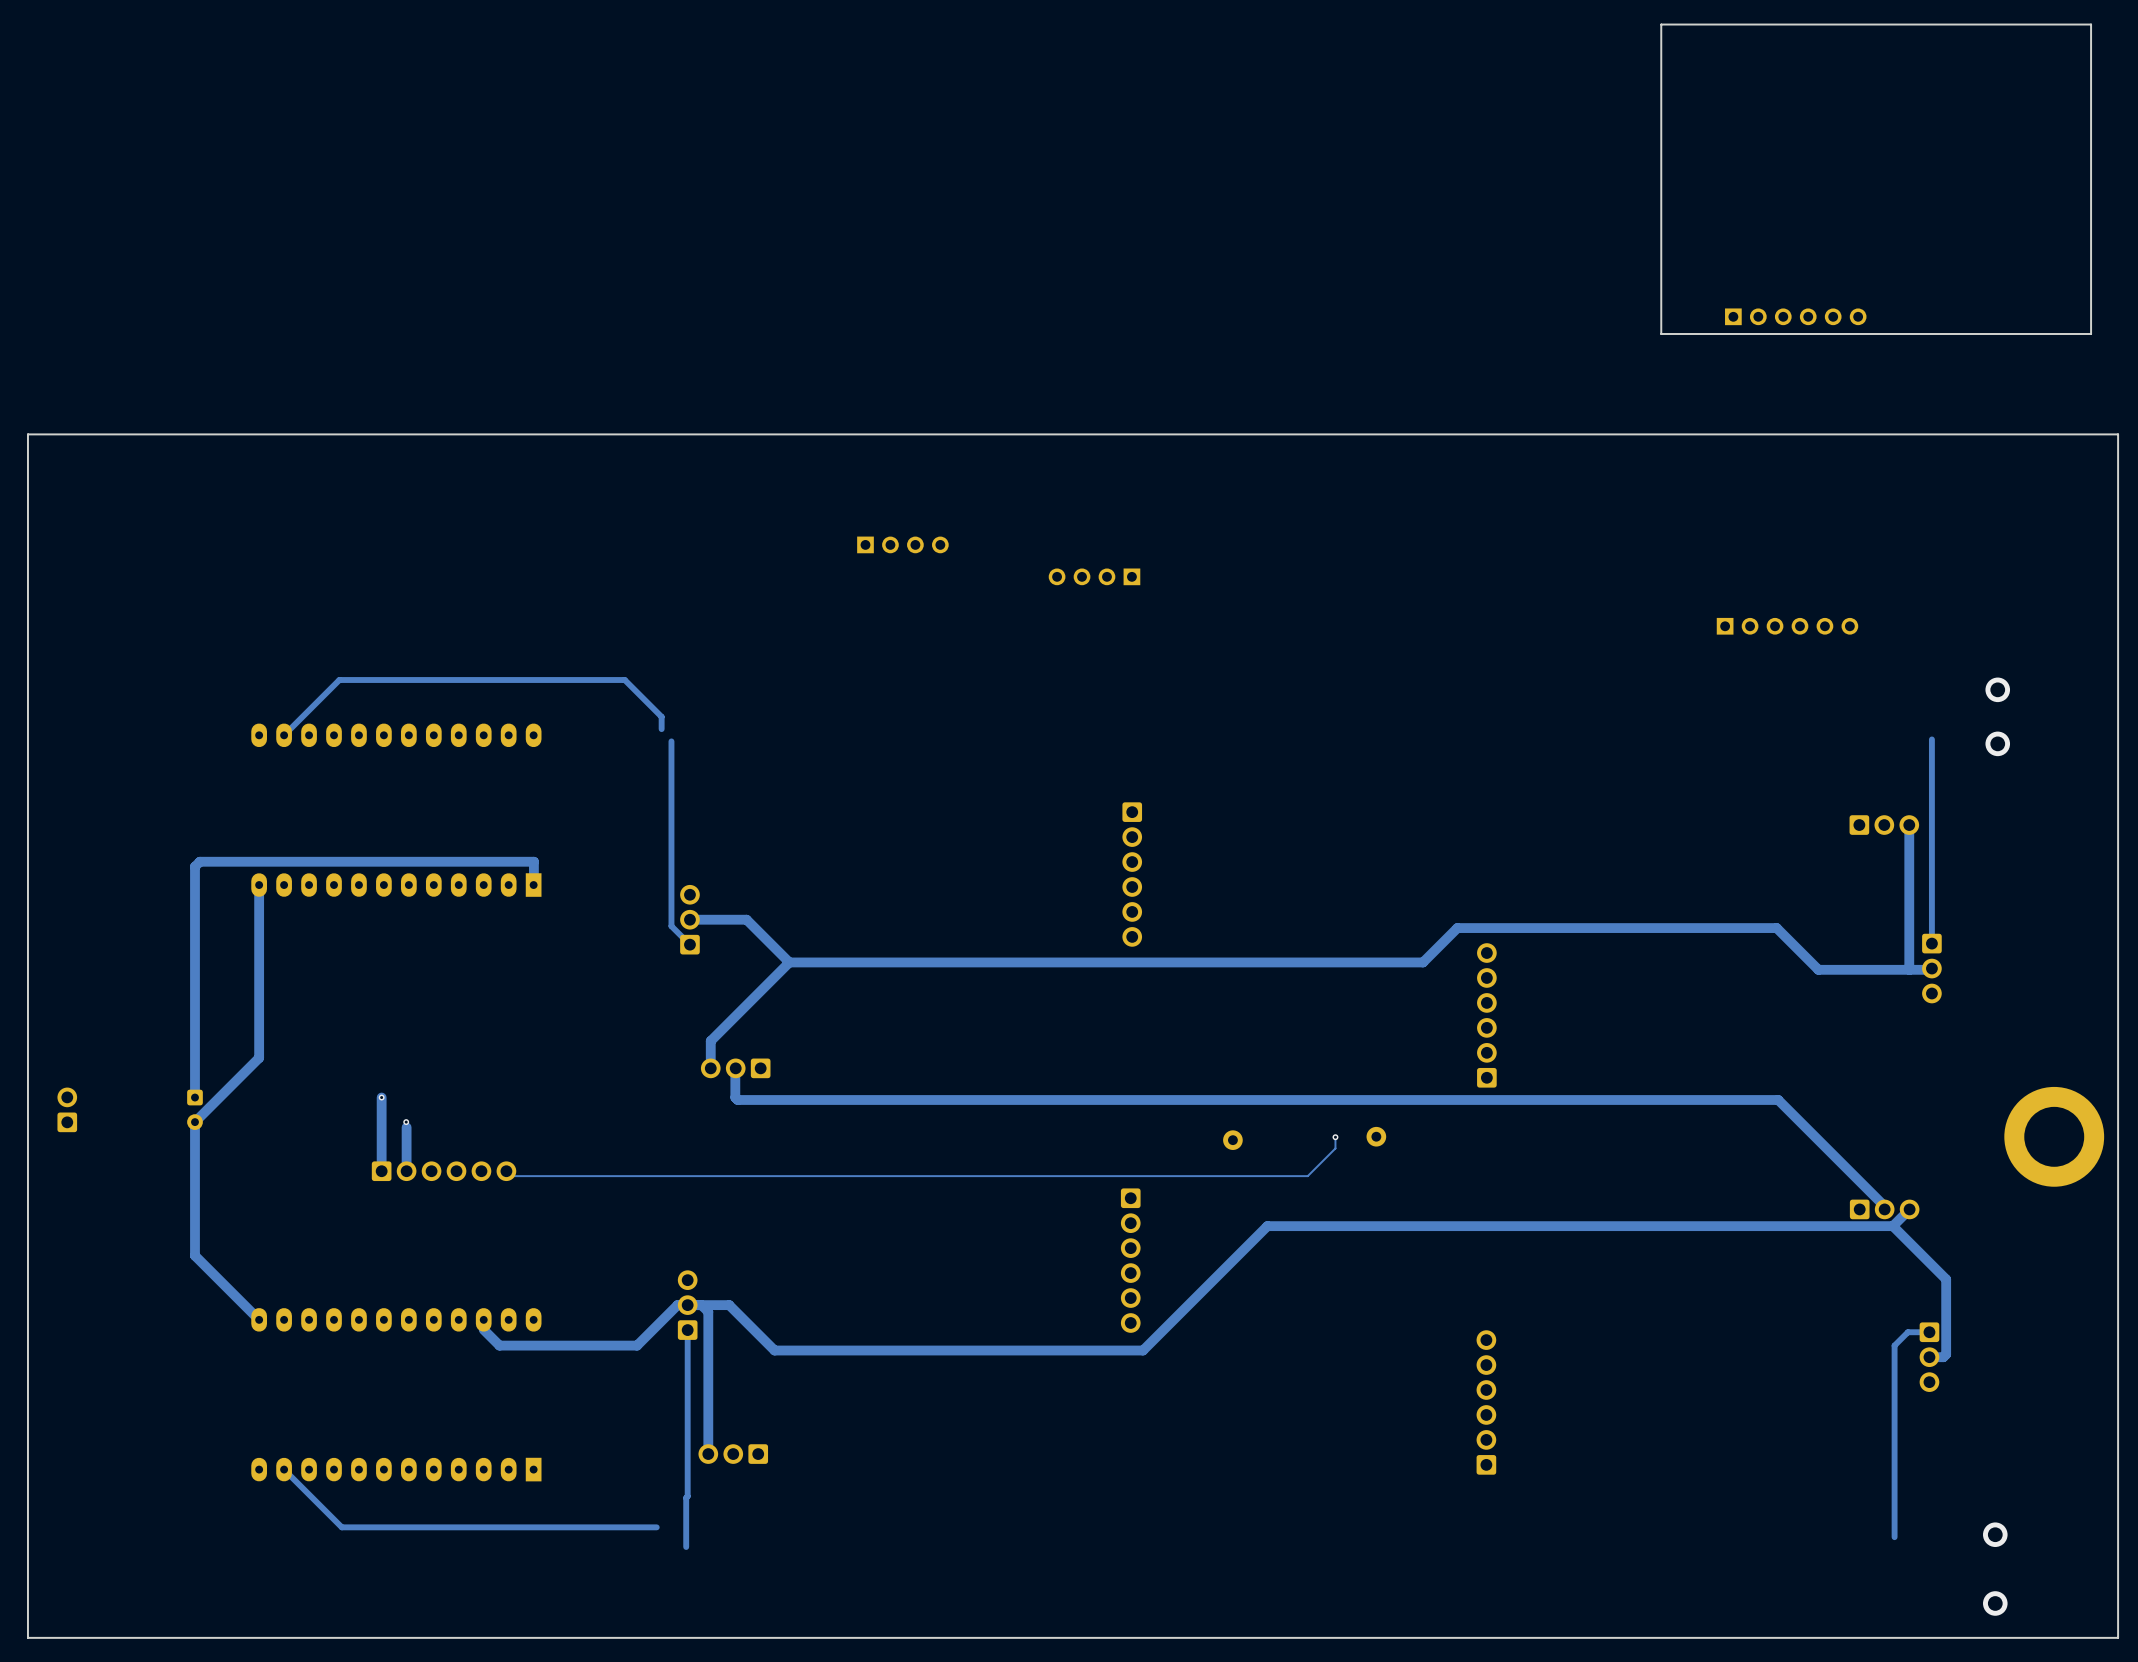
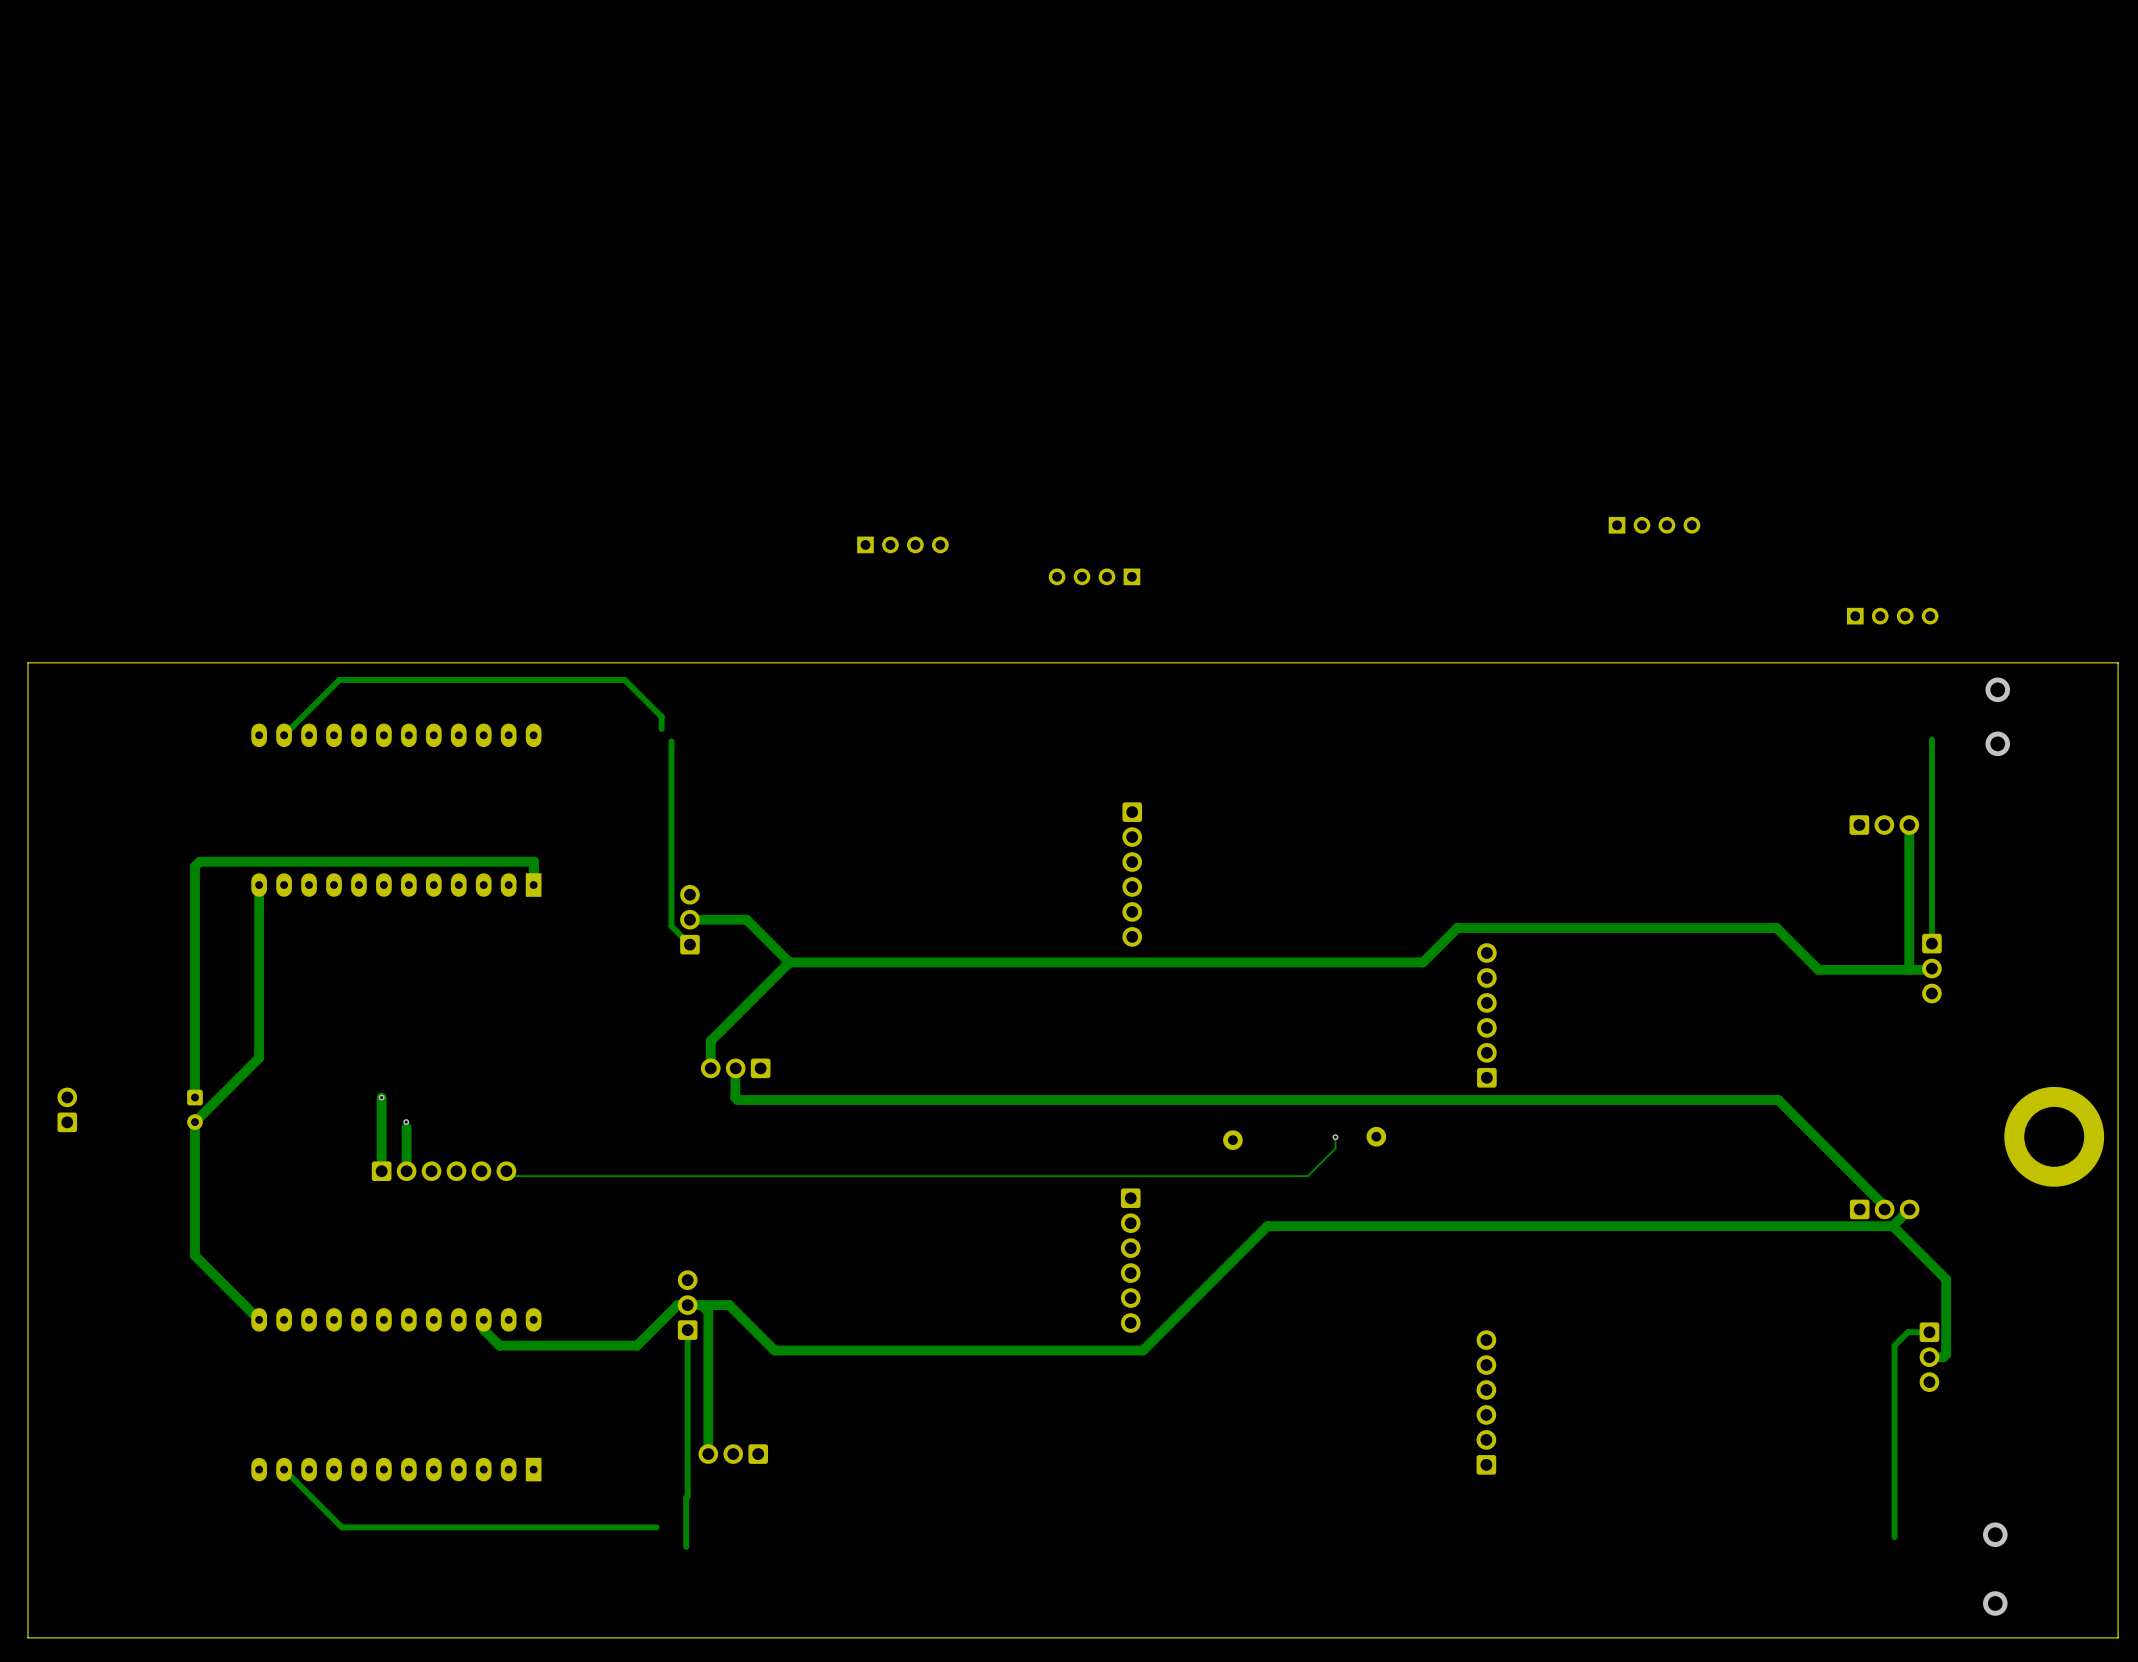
board edge: (2091, 24) (1661, 24) (1661, 333) (2091, 333) (2091, 24) -> none
part: (1795, 316) -> none
part: none -> (1654, 525)
part: none -> (1892, 616)
part: (1787, 626) -> none
board edge: (2118, 662) (2118, 434) (27, 434) (27, 662) -> (2118, 662) (27, 662)

